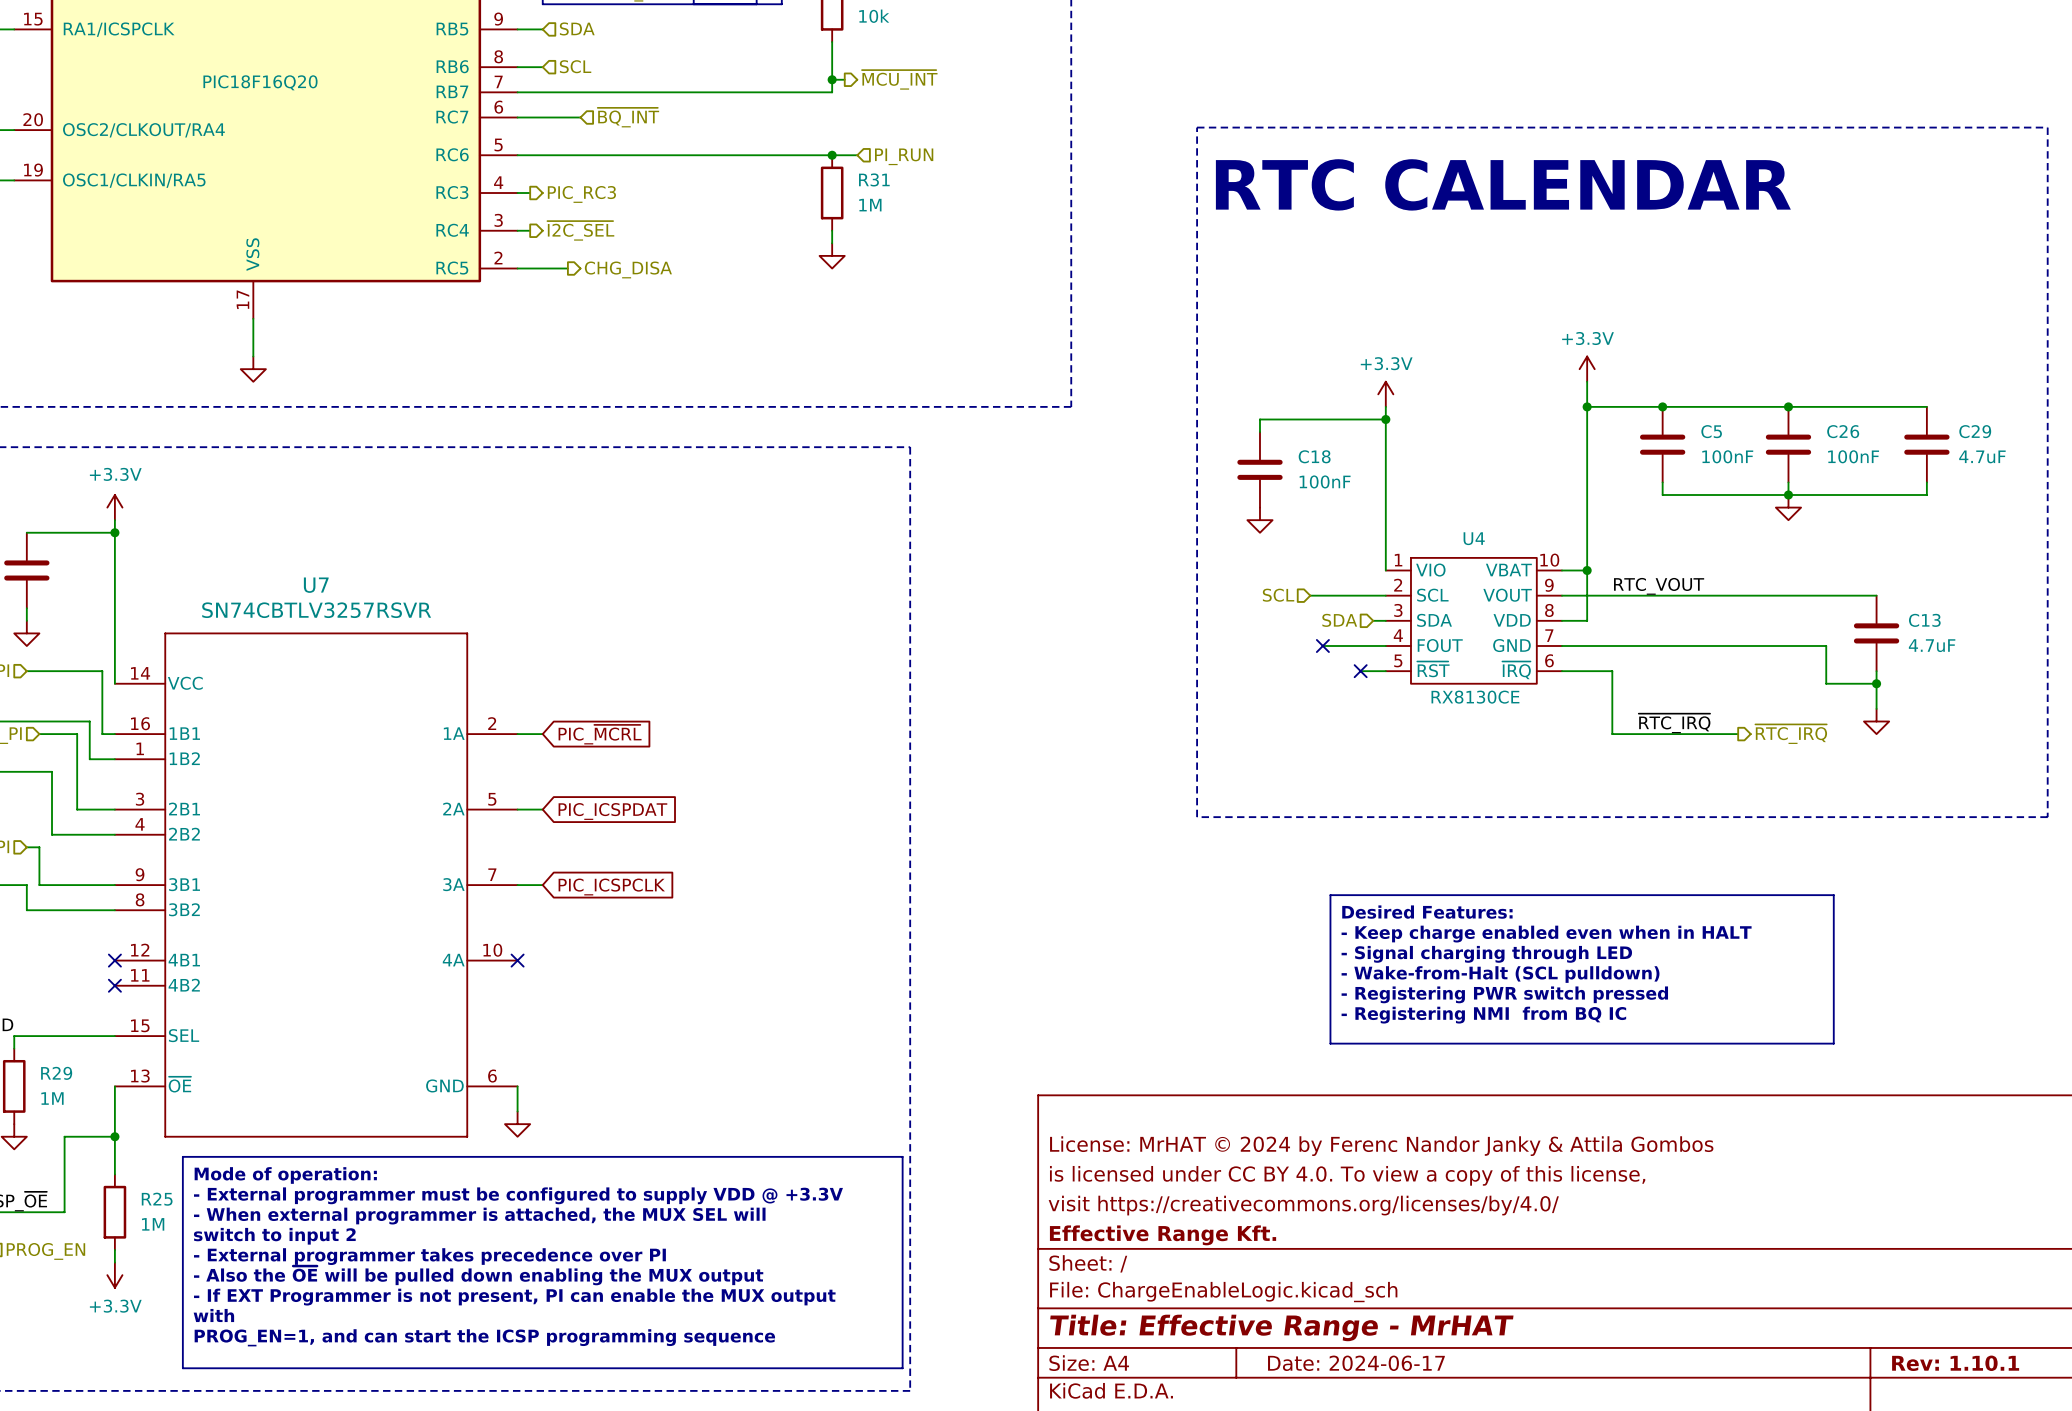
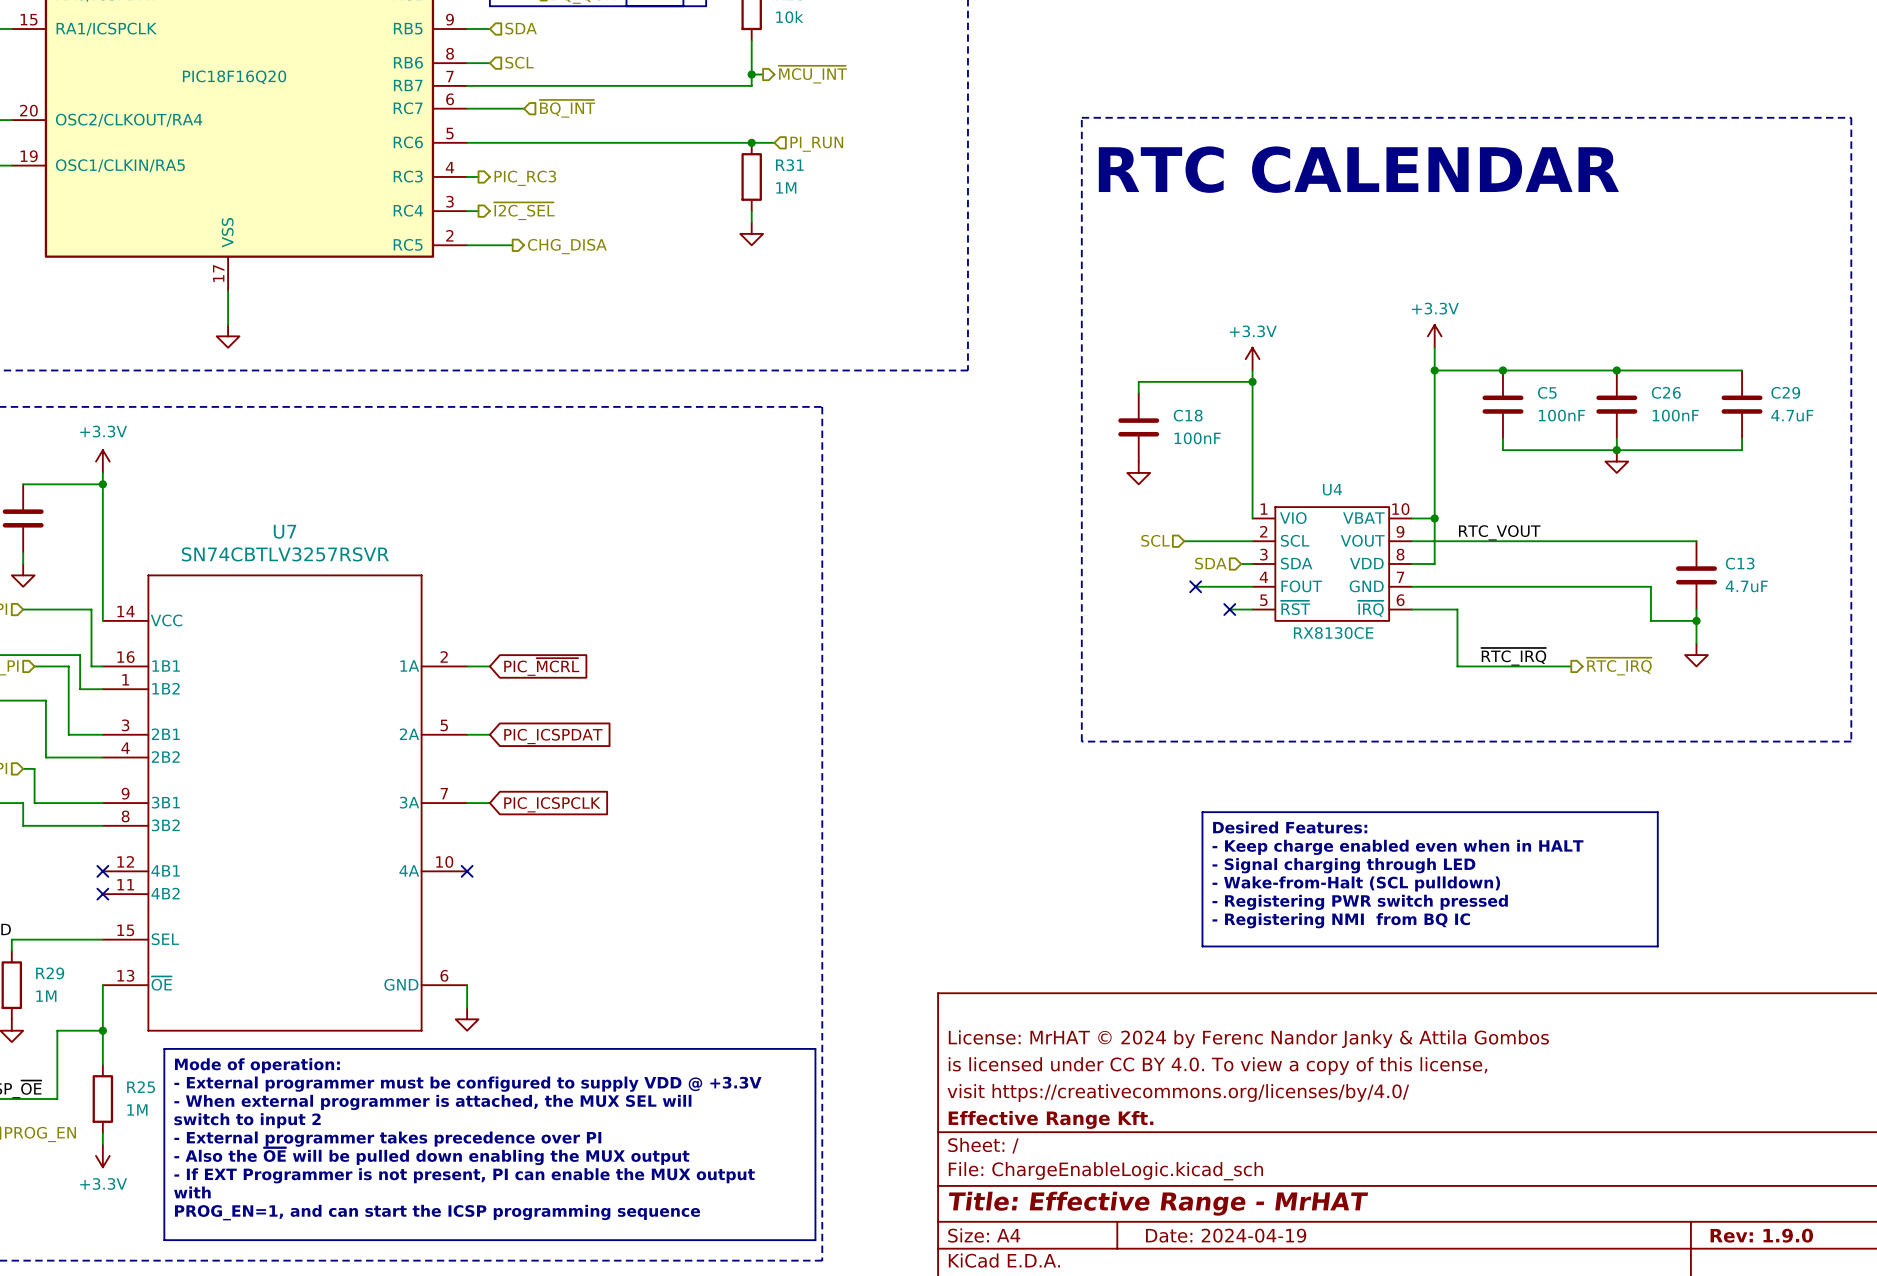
title block: Date: 2024-06-17 (1356, 1363) -> Date: 2024-04-19 (1226, 1235)
title block: Rev: 1.10.1 (1955, 1363) -> Rev: 1.9.0 (1761, 1235)

